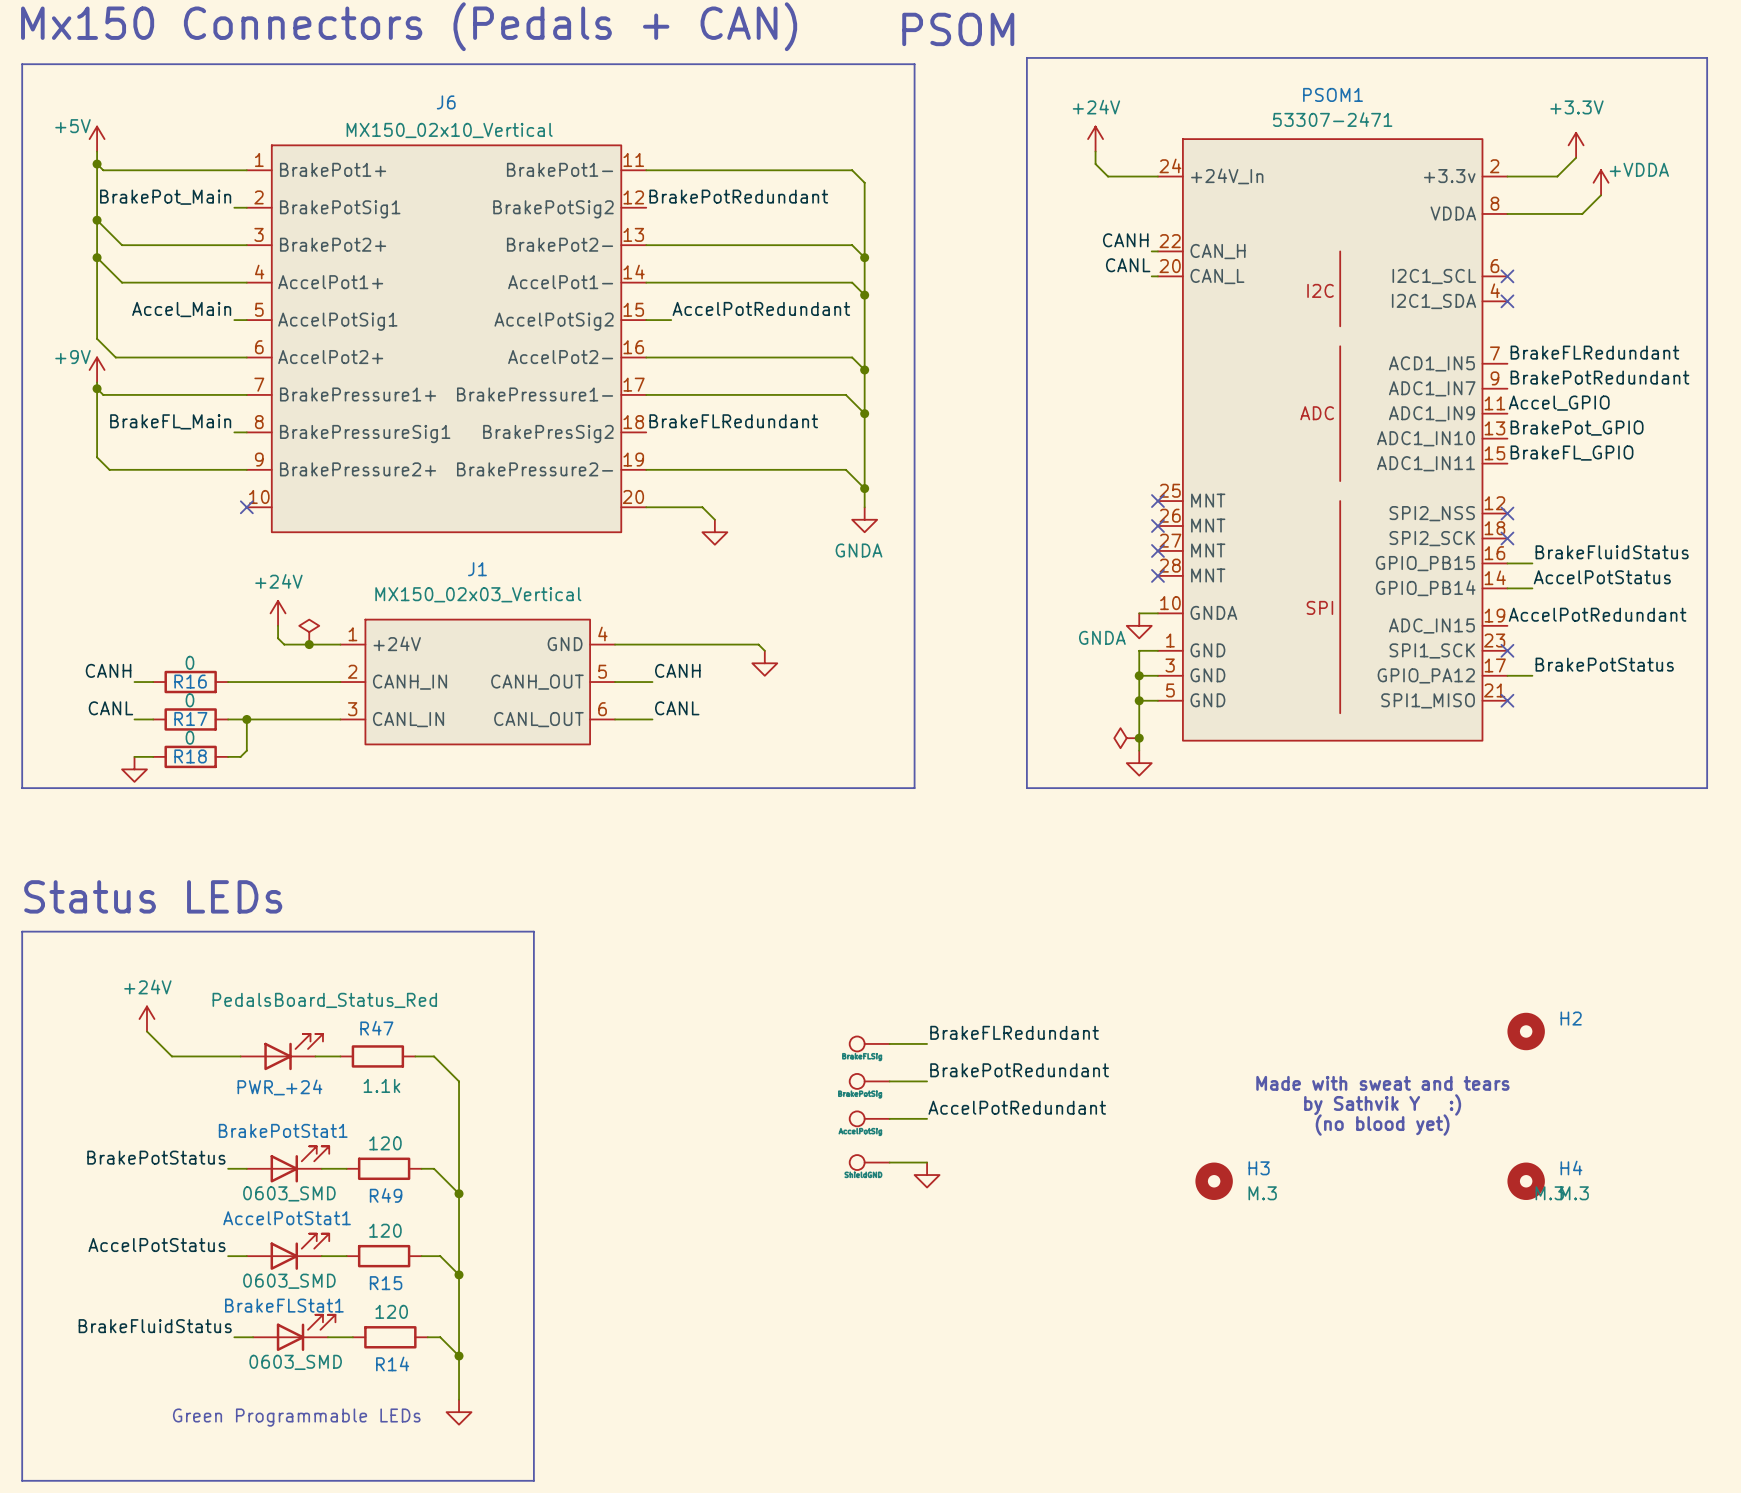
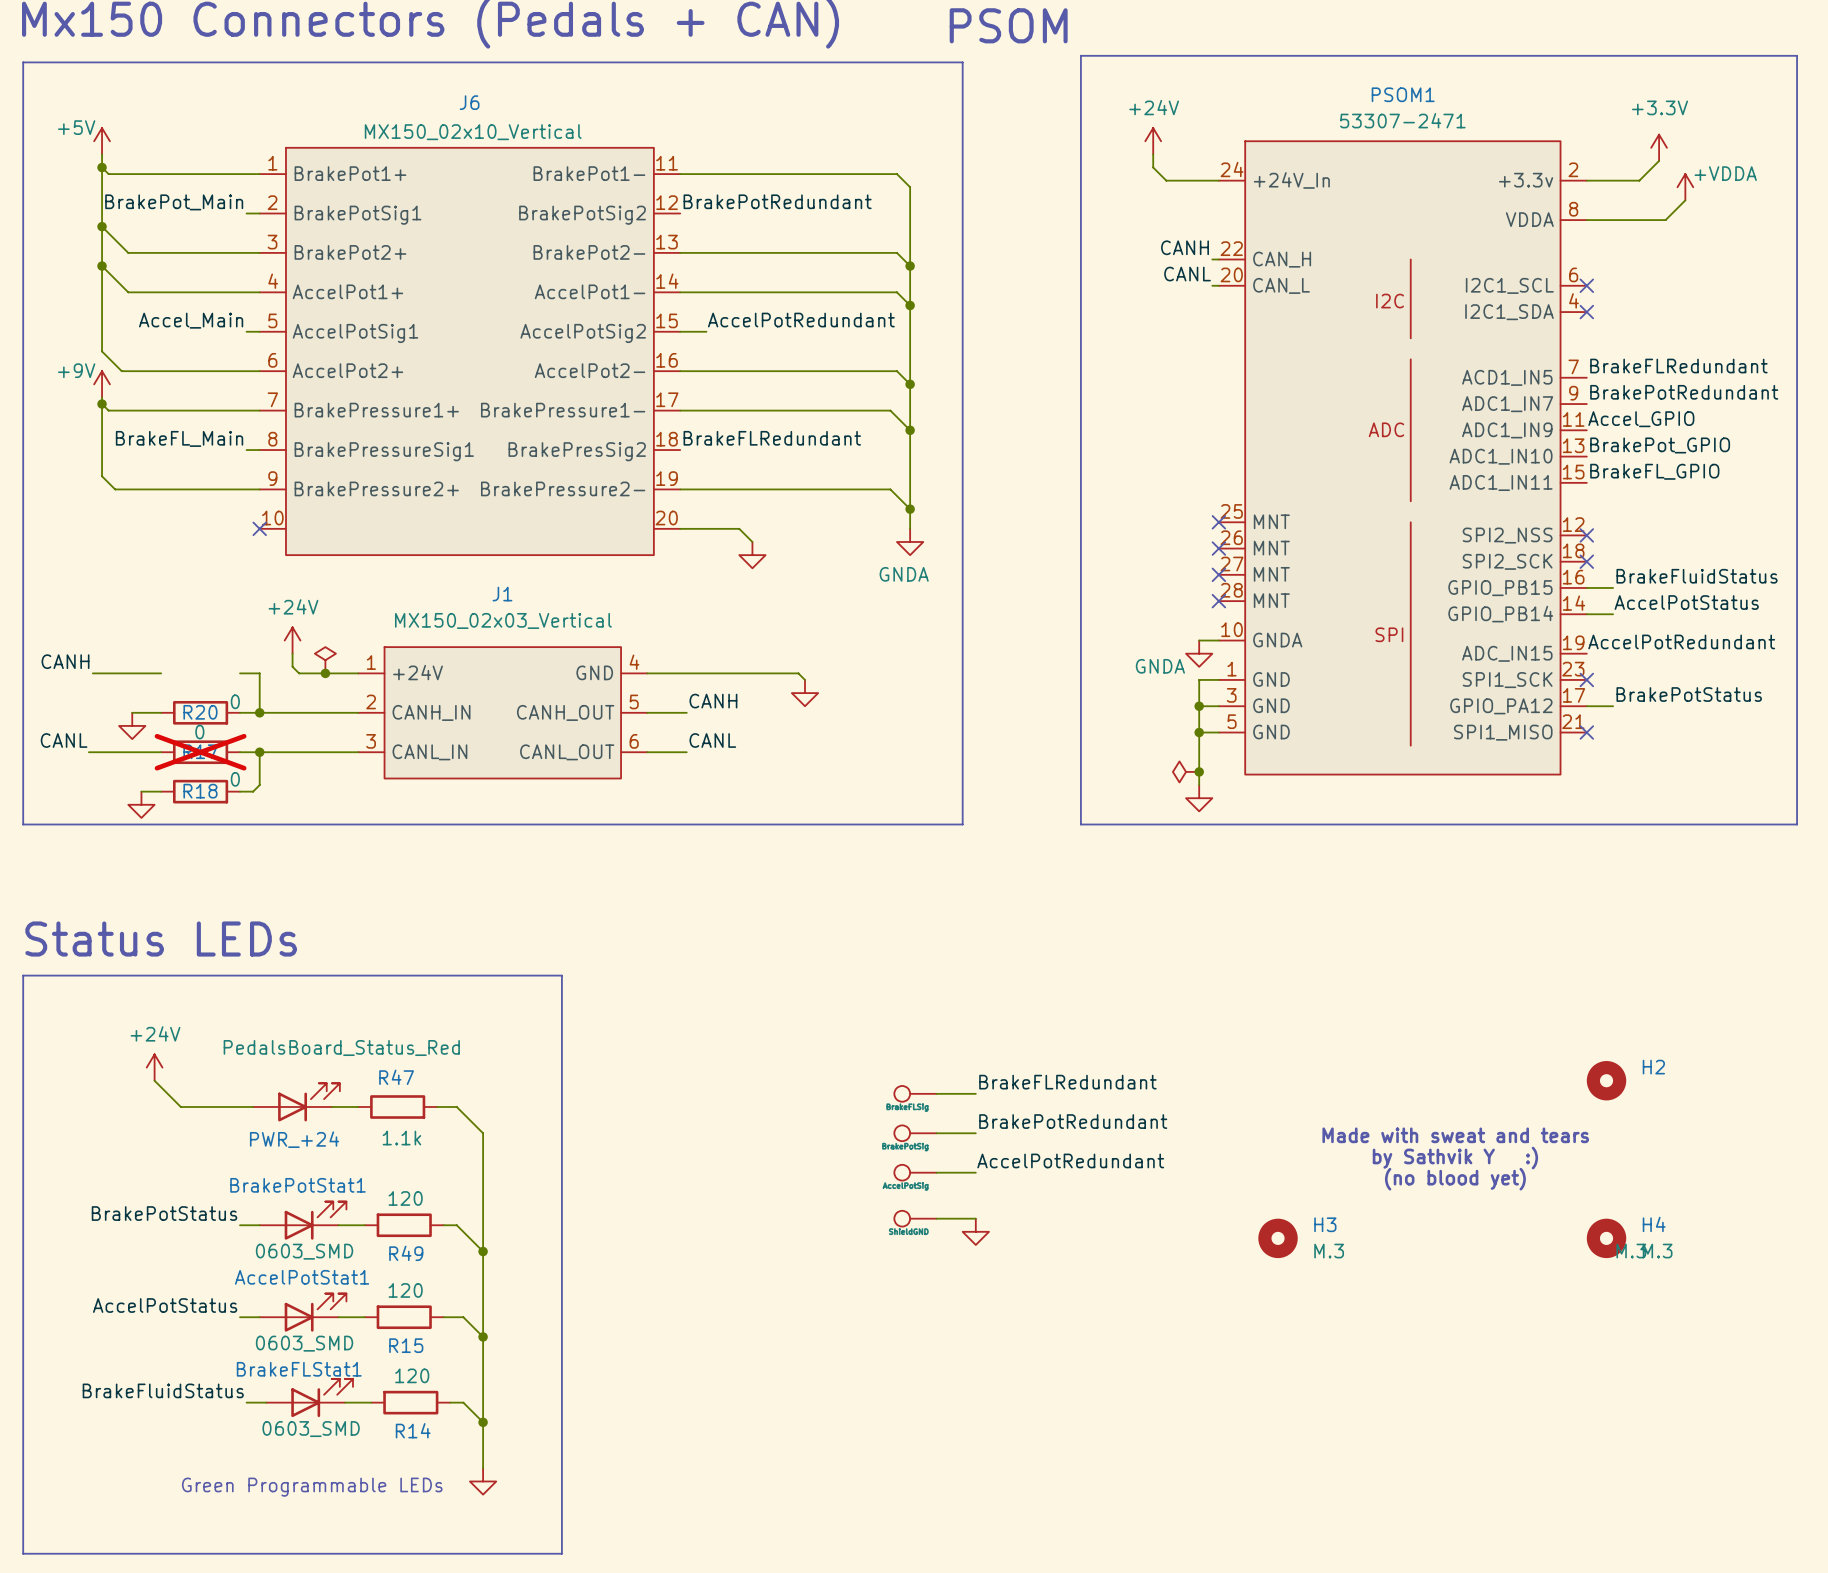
wire: none -> (92, 673) (161, 673)
wire: none -> (240, 673) (259, 673) (259, 712)
R16 value position: 0 (189, 662) -> 0 (235, 701)
label position: CANH (108, 670) -> CANH (65, 661)
R16 name: R16 (190, 681) -> R20 (200, 712)
wire: none -> (132, 712) (141, 712)
junction: none -> (259, 712)
power symbol: none -> (132, 725)
label position: CANL (110, 708) -> CANL (64, 740)
wire: none -> (88, 752) (141, 752)
R17 do-not-place cross: none -> (200, 752)
R18 value position: 0 (189, 737) -> 0 (235, 779)

